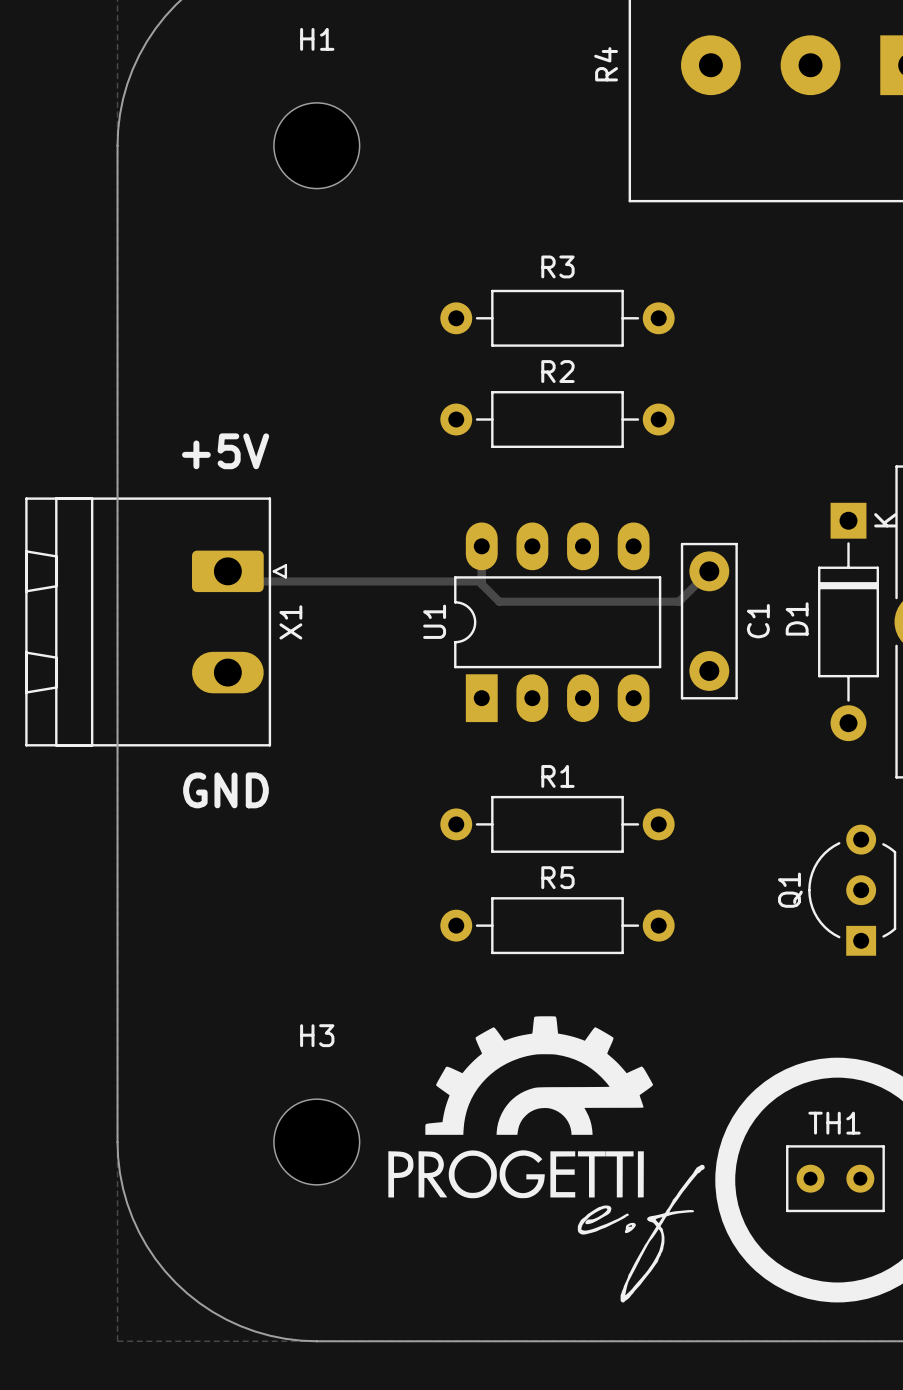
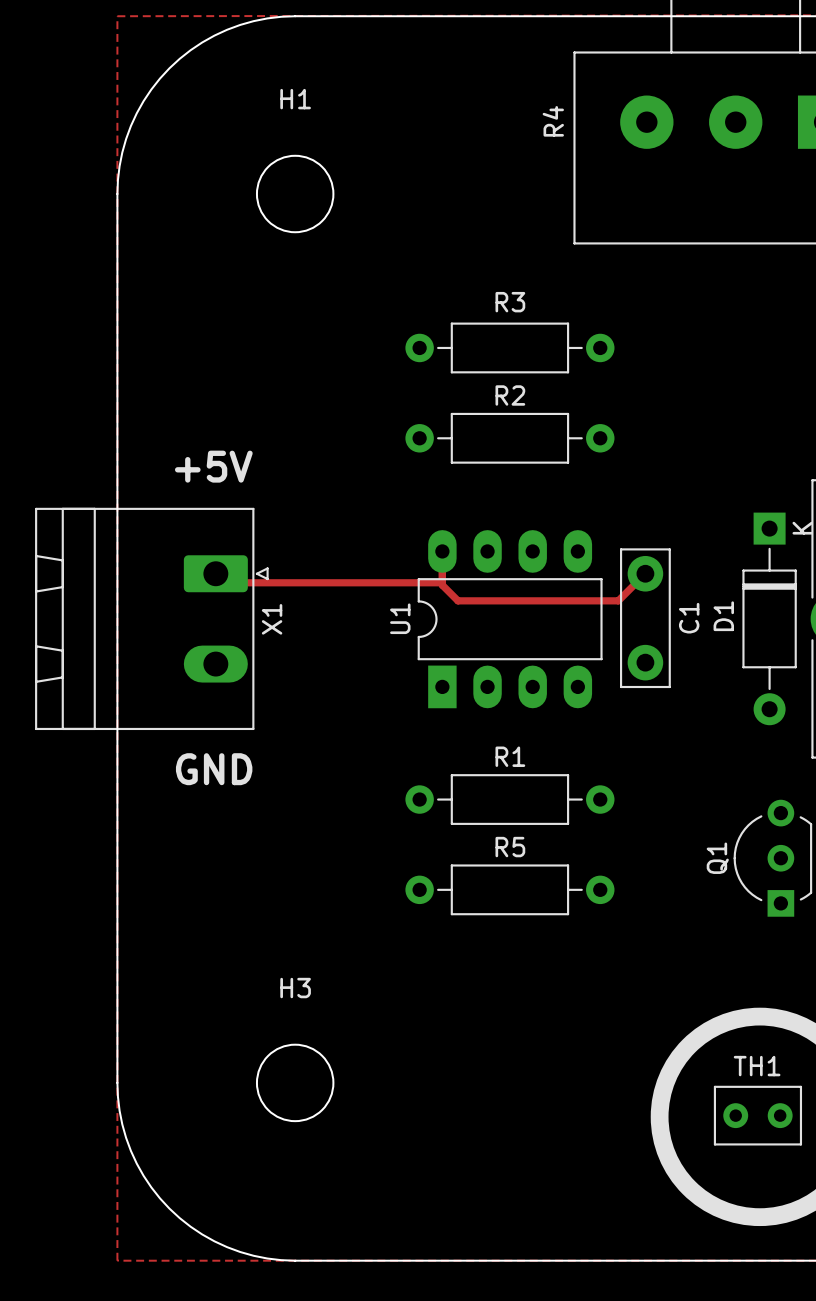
drawing: [388, 1016, 705, 1303] -> none

